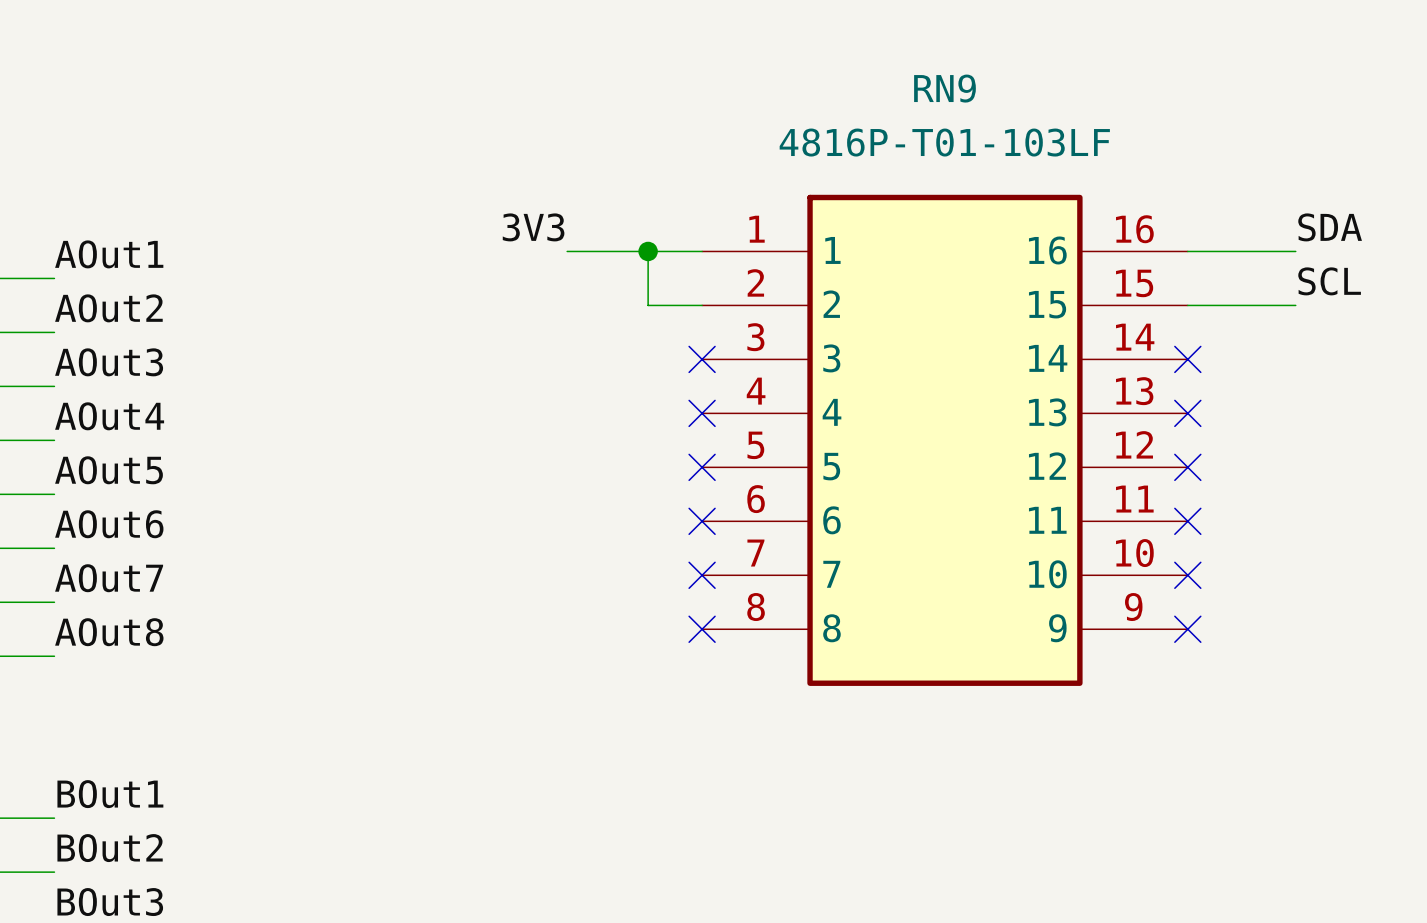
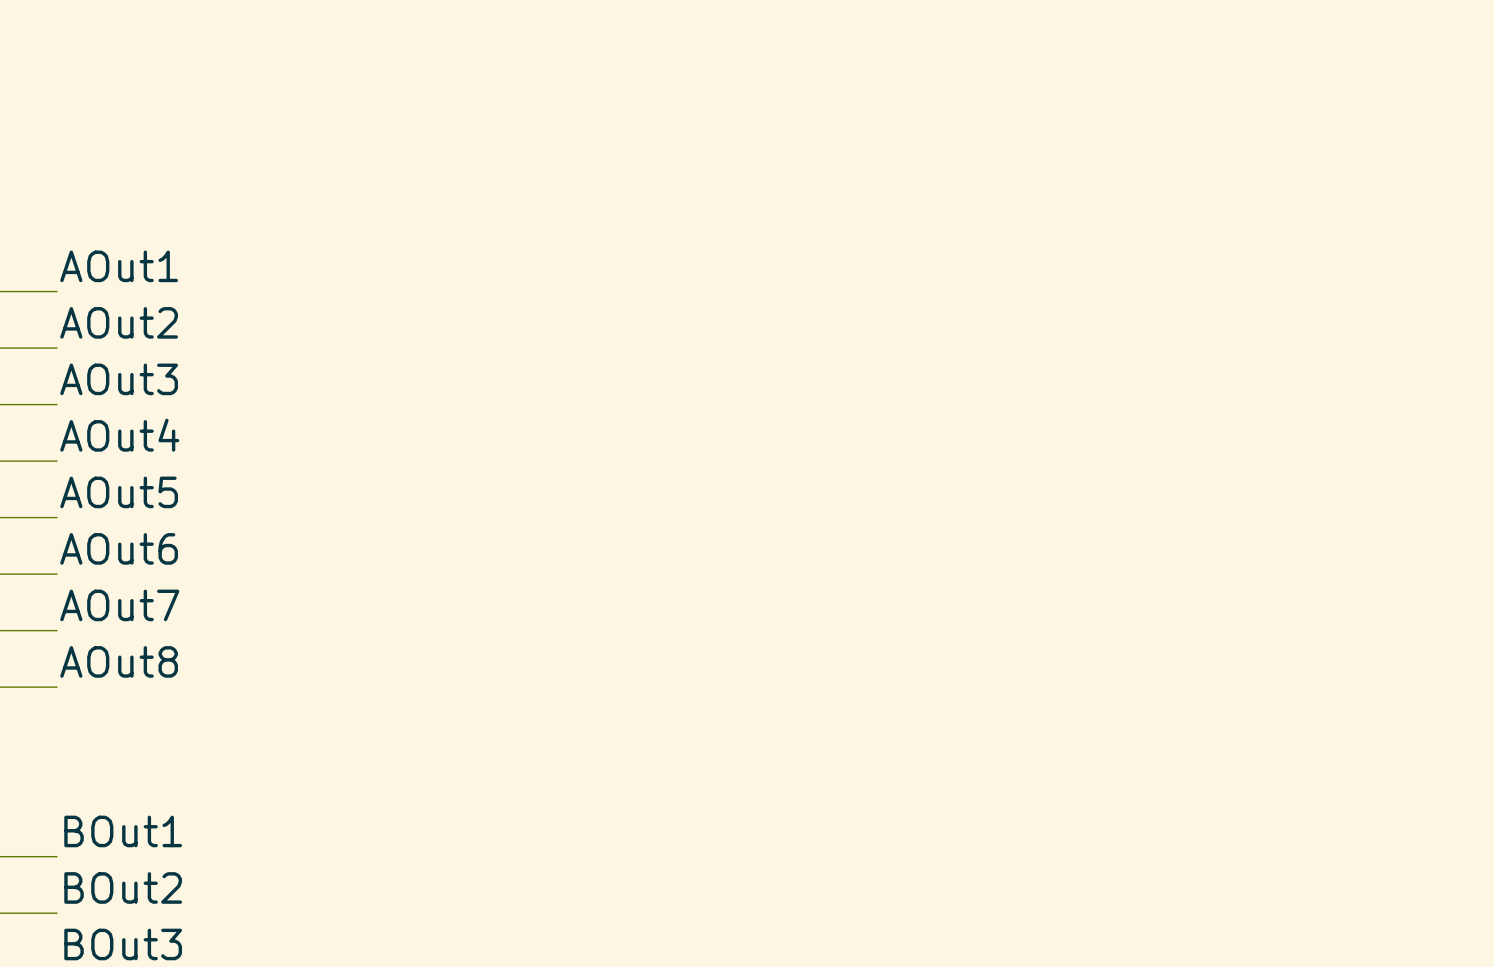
label: 3V3 (533, 227) -> none
label: SDA (1330, 227) -> none
wire: (567, 251) (702, 251) -> none
wire: (648, 251) (648, 305) (702, 305) -> none
junction: (648, 251) -> none
wire: (1187, 251) (1295, 251) -> none
label: SCL (1329, 281) -> none
wire: (1187, 305) (1295, 305) -> none
no-connect mark: (702, 359) -> none
no-connect mark: (1187, 359) -> none
no-connect mark: (702, 413) -> none
no-connect mark: (1187, 413) -> none
RN9: 4816P-T01-103LF (944, 440) -> none
no-connect mark: (702, 467) -> none
no-connect mark: (1187, 467) -> none
no-connect mark: (702, 521) -> none
no-connect mark: (1187, 521) -> none
no-connect mark: (702, 575) -> none
no-connect mark: (1187, 575) -> none
no-connect mark: (702, 629) -> none
no-connect mark: (1187, 629) -> none

